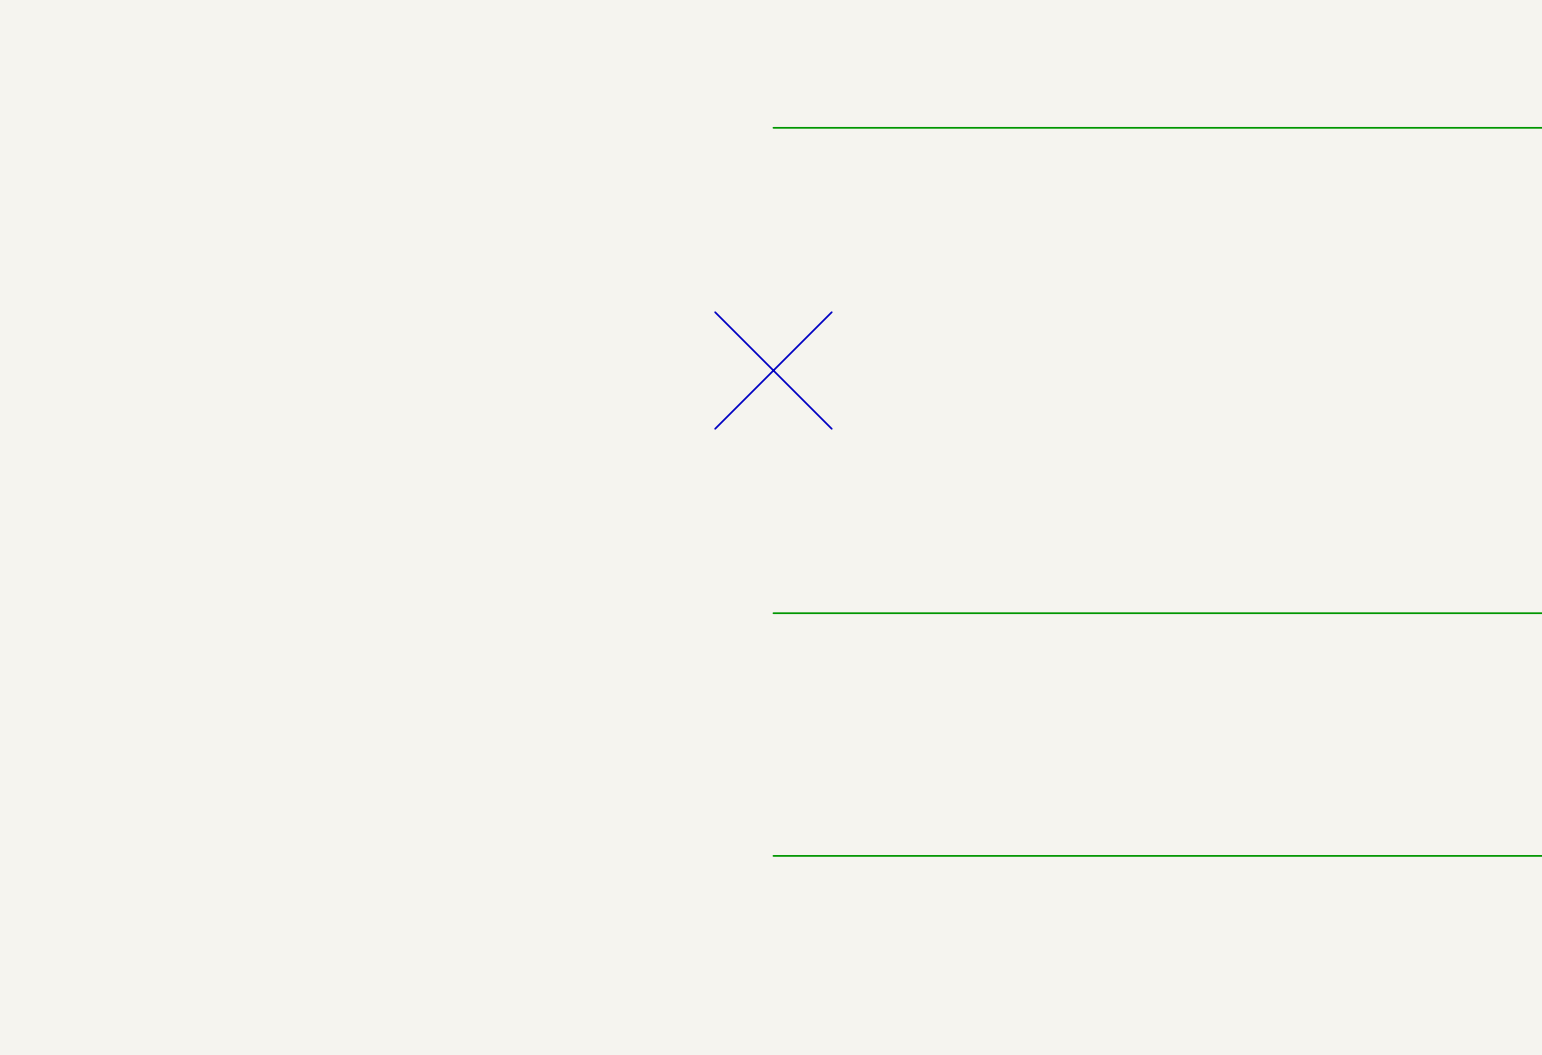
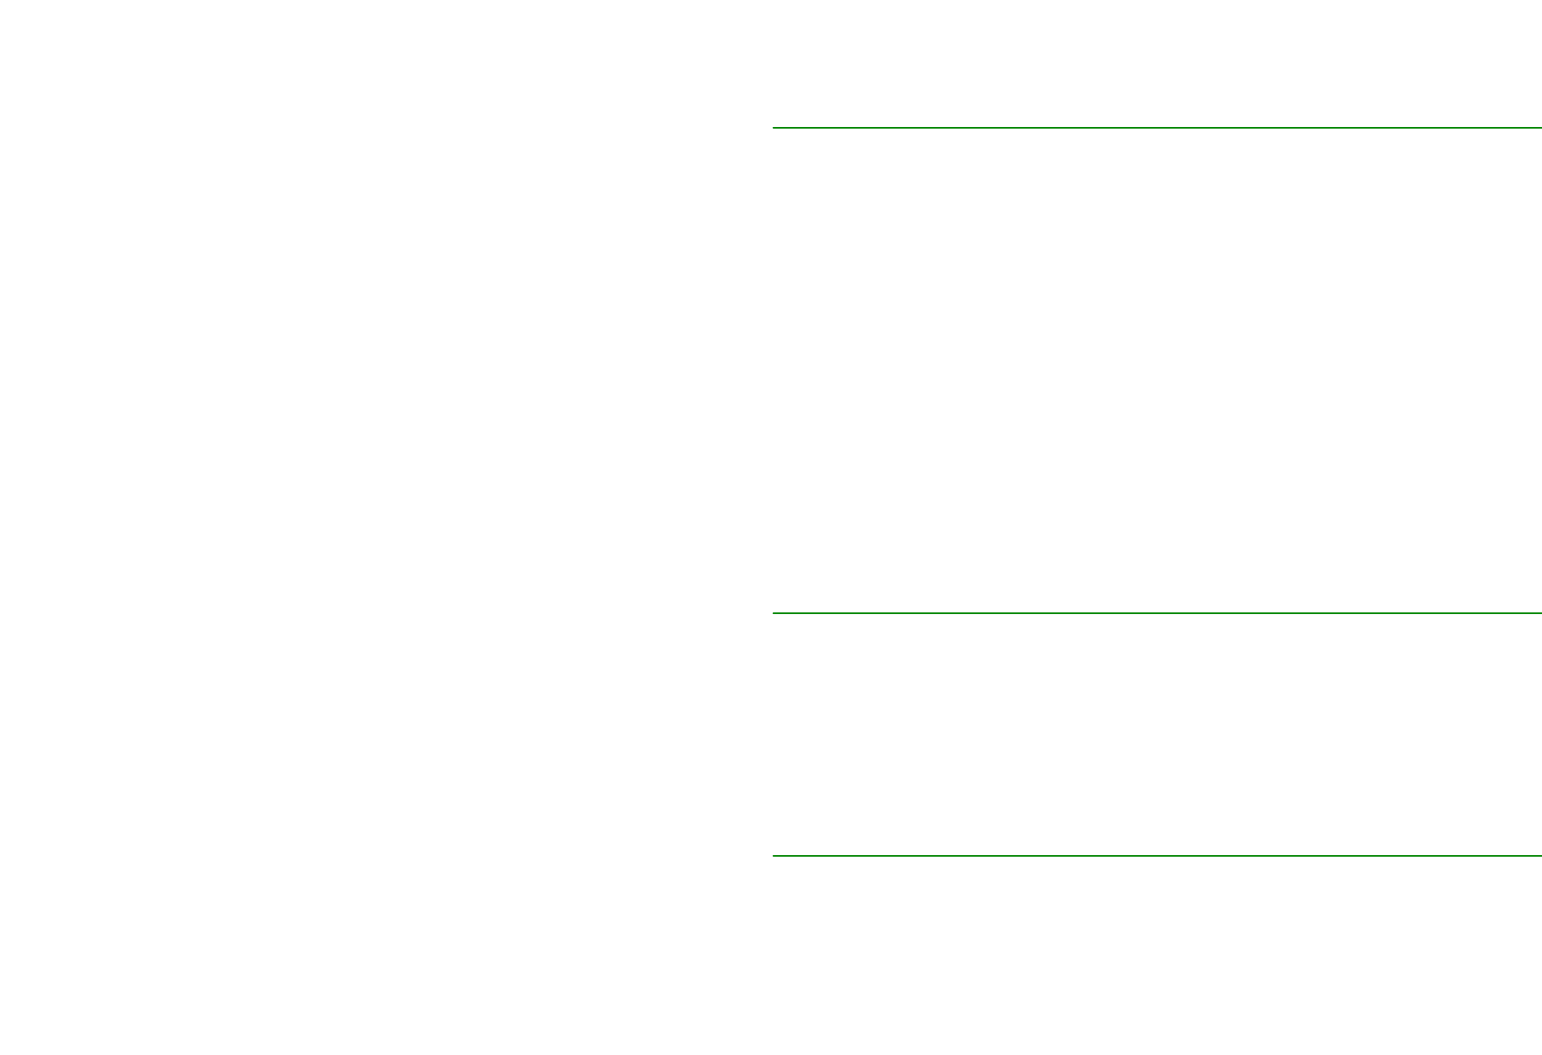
no-connect mark: (773, 370) -> none

